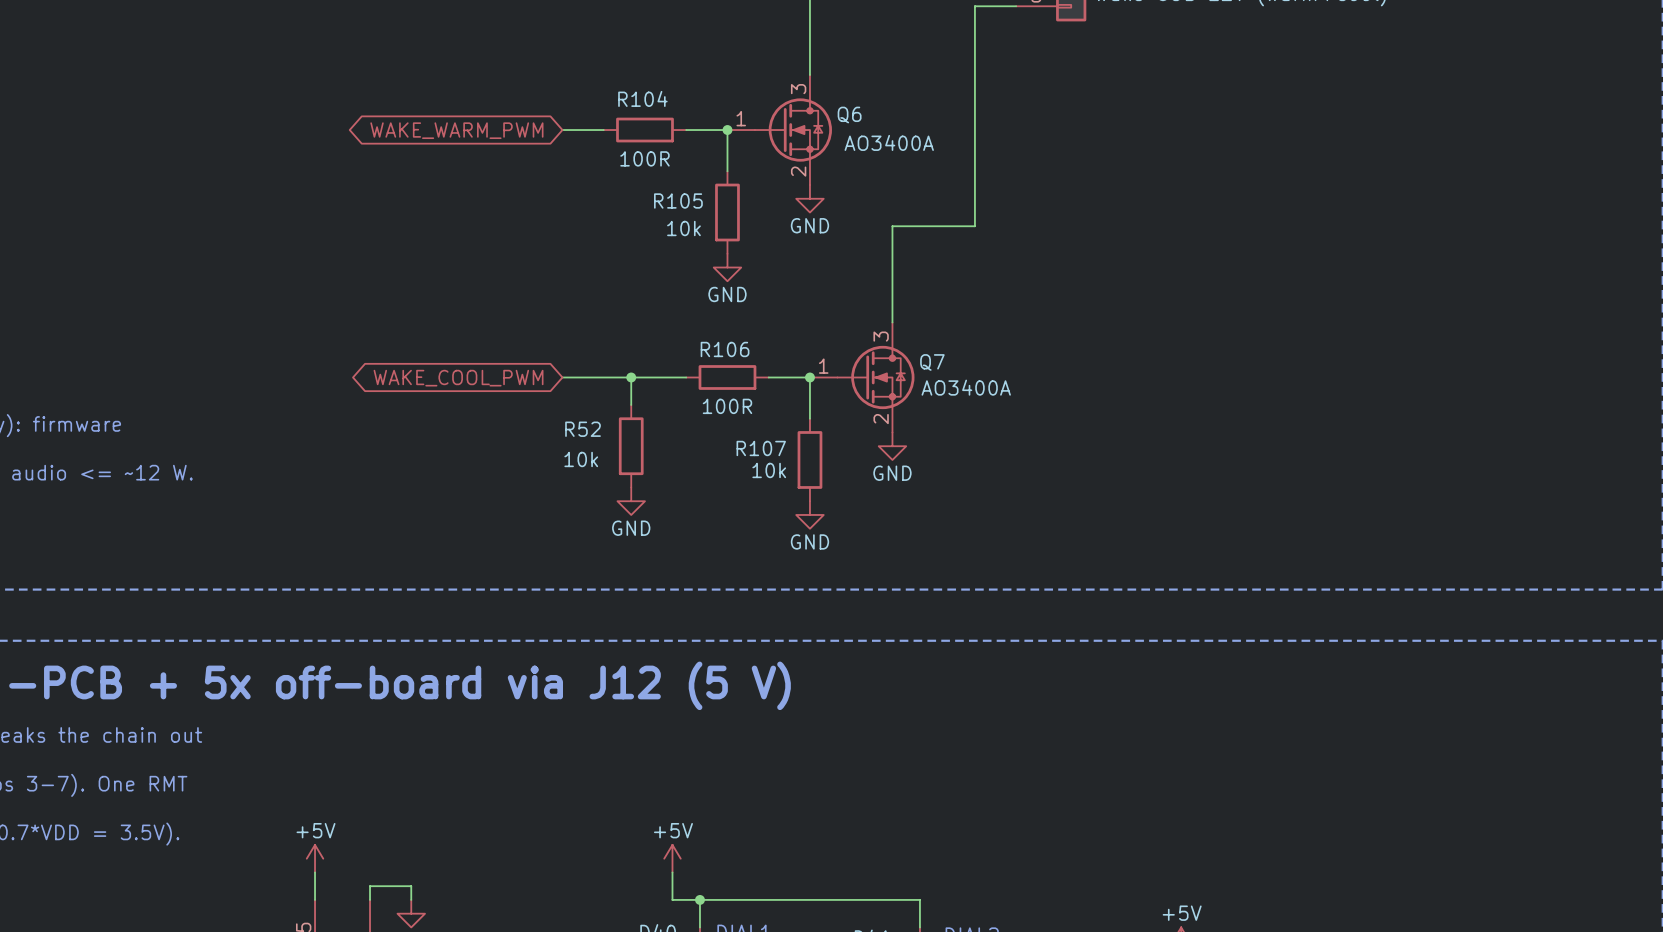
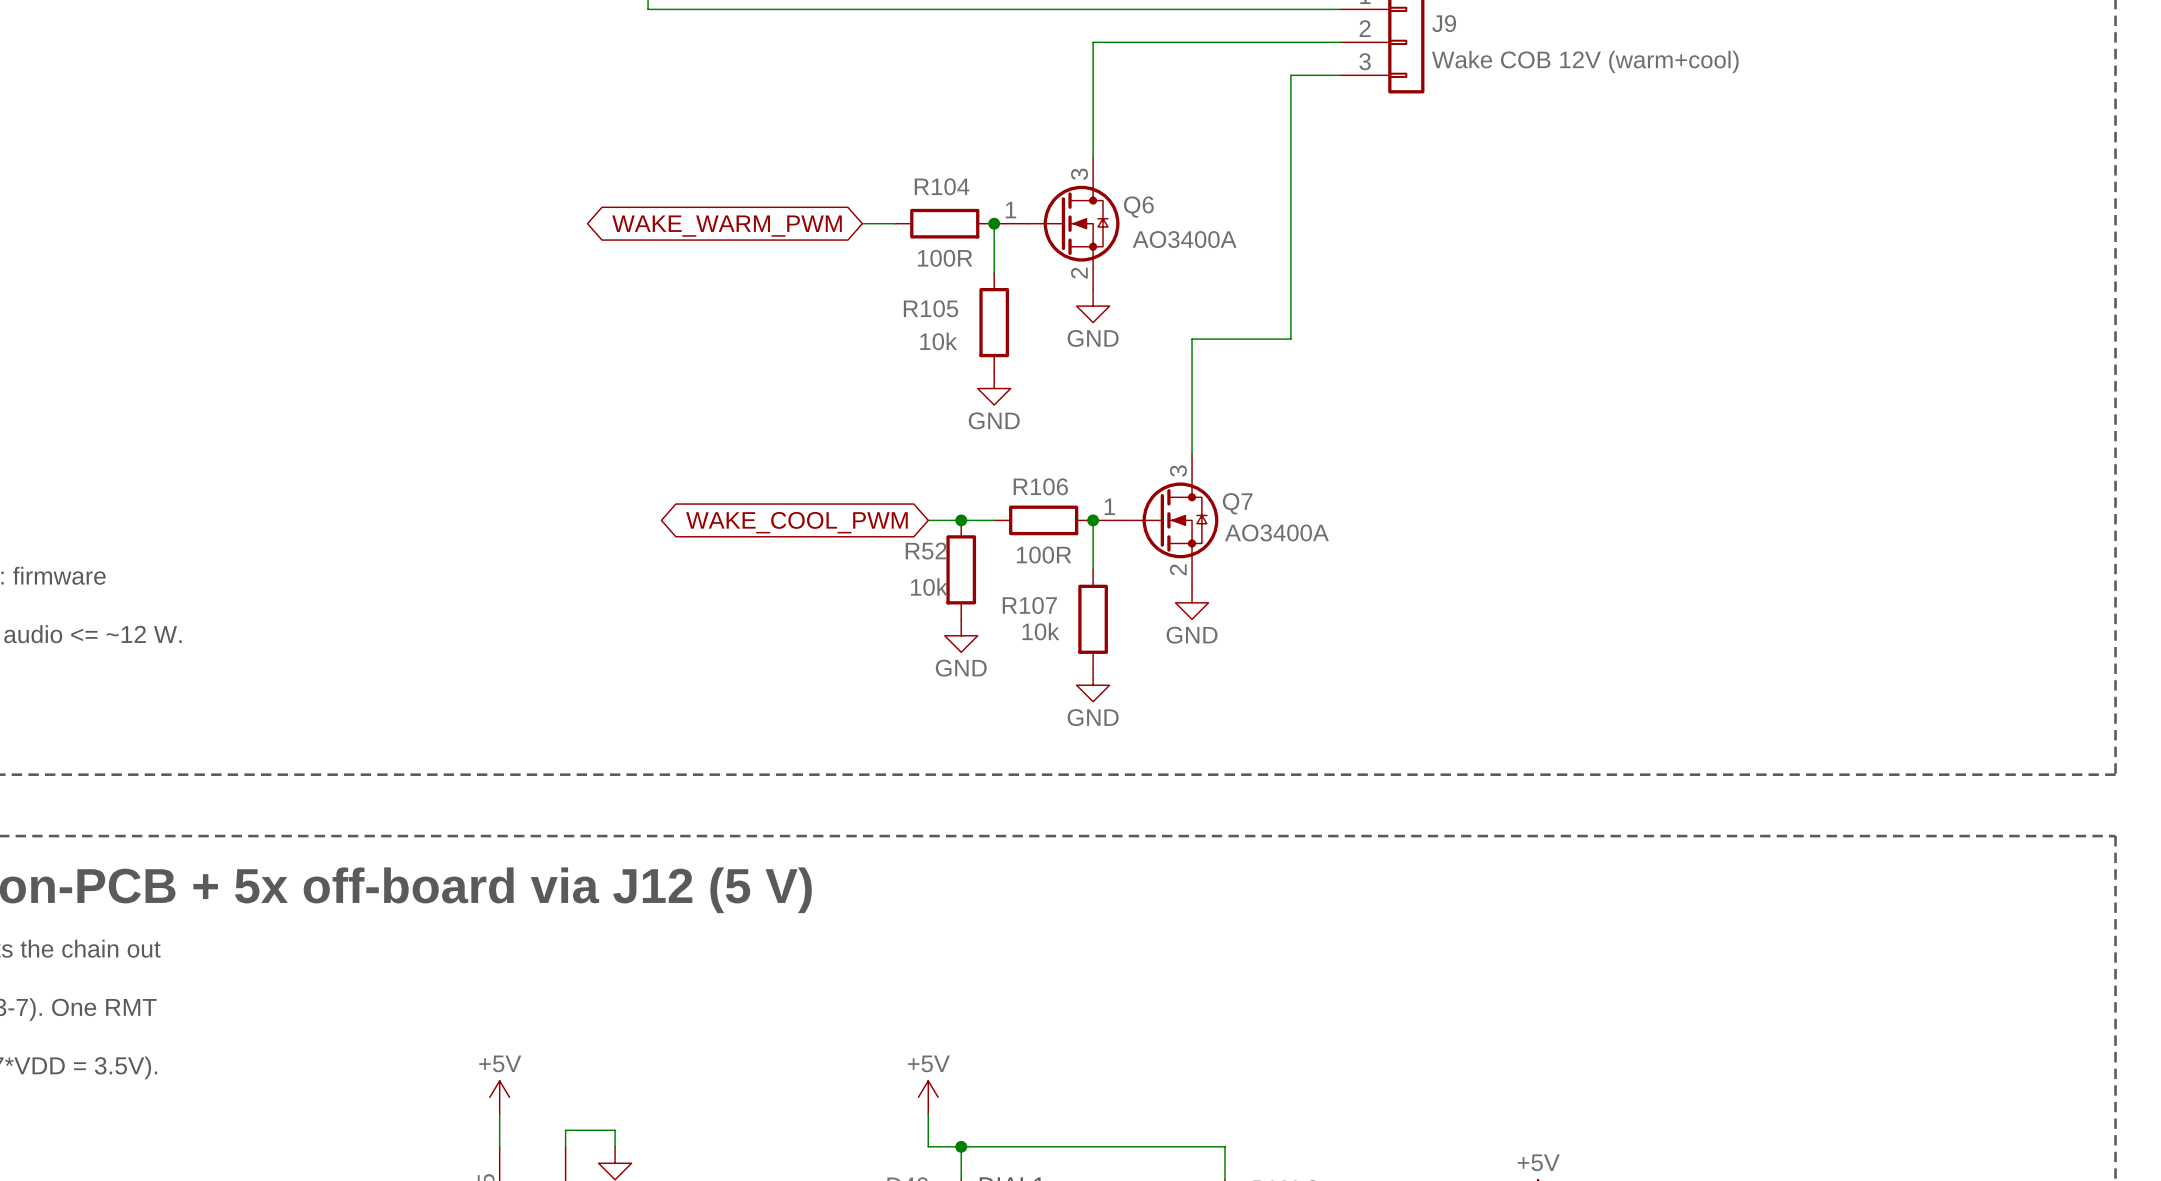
global label position: WAKE_WARM_PWM (456, 130) -> WAKE_WARM_PWM (727, 226)
wire: (562, 130) (603, 130) -> none
wire: none -> (862, 223) (895, 223)
R104 position: (644, 130) -> (944, 223)
wire: (686, 130) (727, 130) -> none
wire: (562, 377) (672, 377) -> none
wire: (631, 377) (631, 404) -> none
junction: (631, 377) -> none
junction: none -> (961, 520)
R106 position: (727, 377) -> (1043, 520)
wire: (768, 377) (809, 377) -> (944, 520) (994, 520)
global label position: WAKE_COOL_PWM (458, 378) -> WAKE_COOL_PWM (796, 522)
R52 name position: R52 (583, 429) -> R52 (926, 551)
R52 position: (631, 446) -> (961, 569)
R52 value position: 10k (581, 459) -> 10k (929, 587)
power symbol position: GND (631, 501) -> GND (961, 635)

